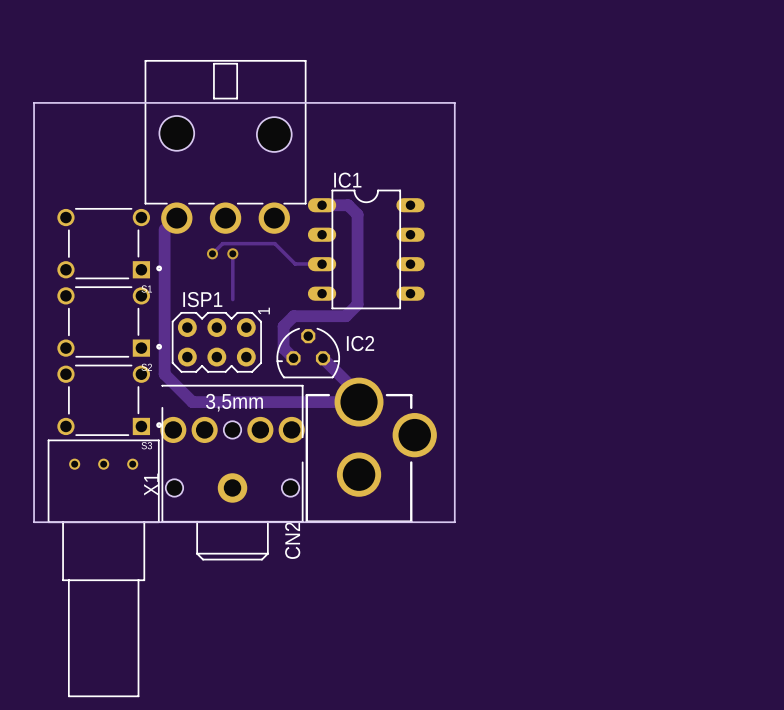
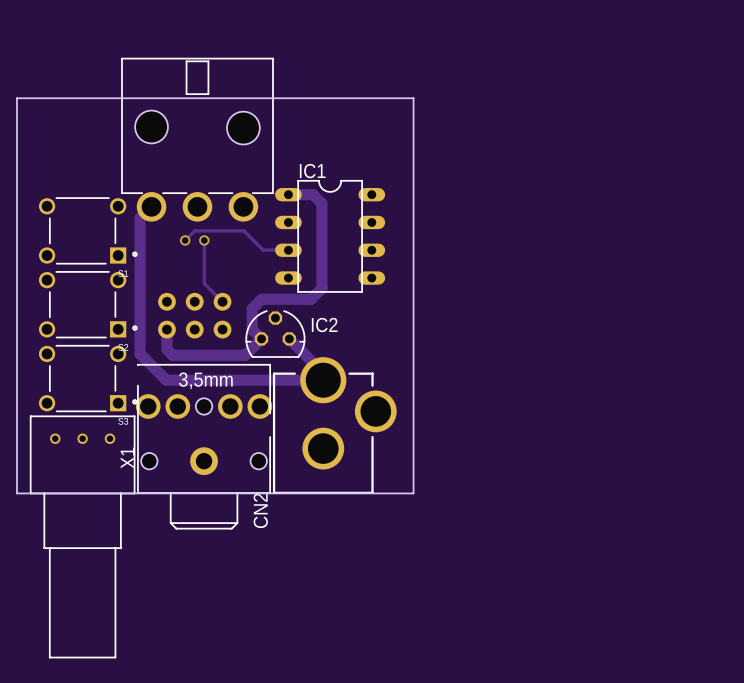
track: none -> (204, 283) (222, 301)
ISP1 side: top (216, 342) -> bottom (194, 315)
track: none -> (166, 329) (166, 349) (172, 355) (245, 355) (261, 338)

